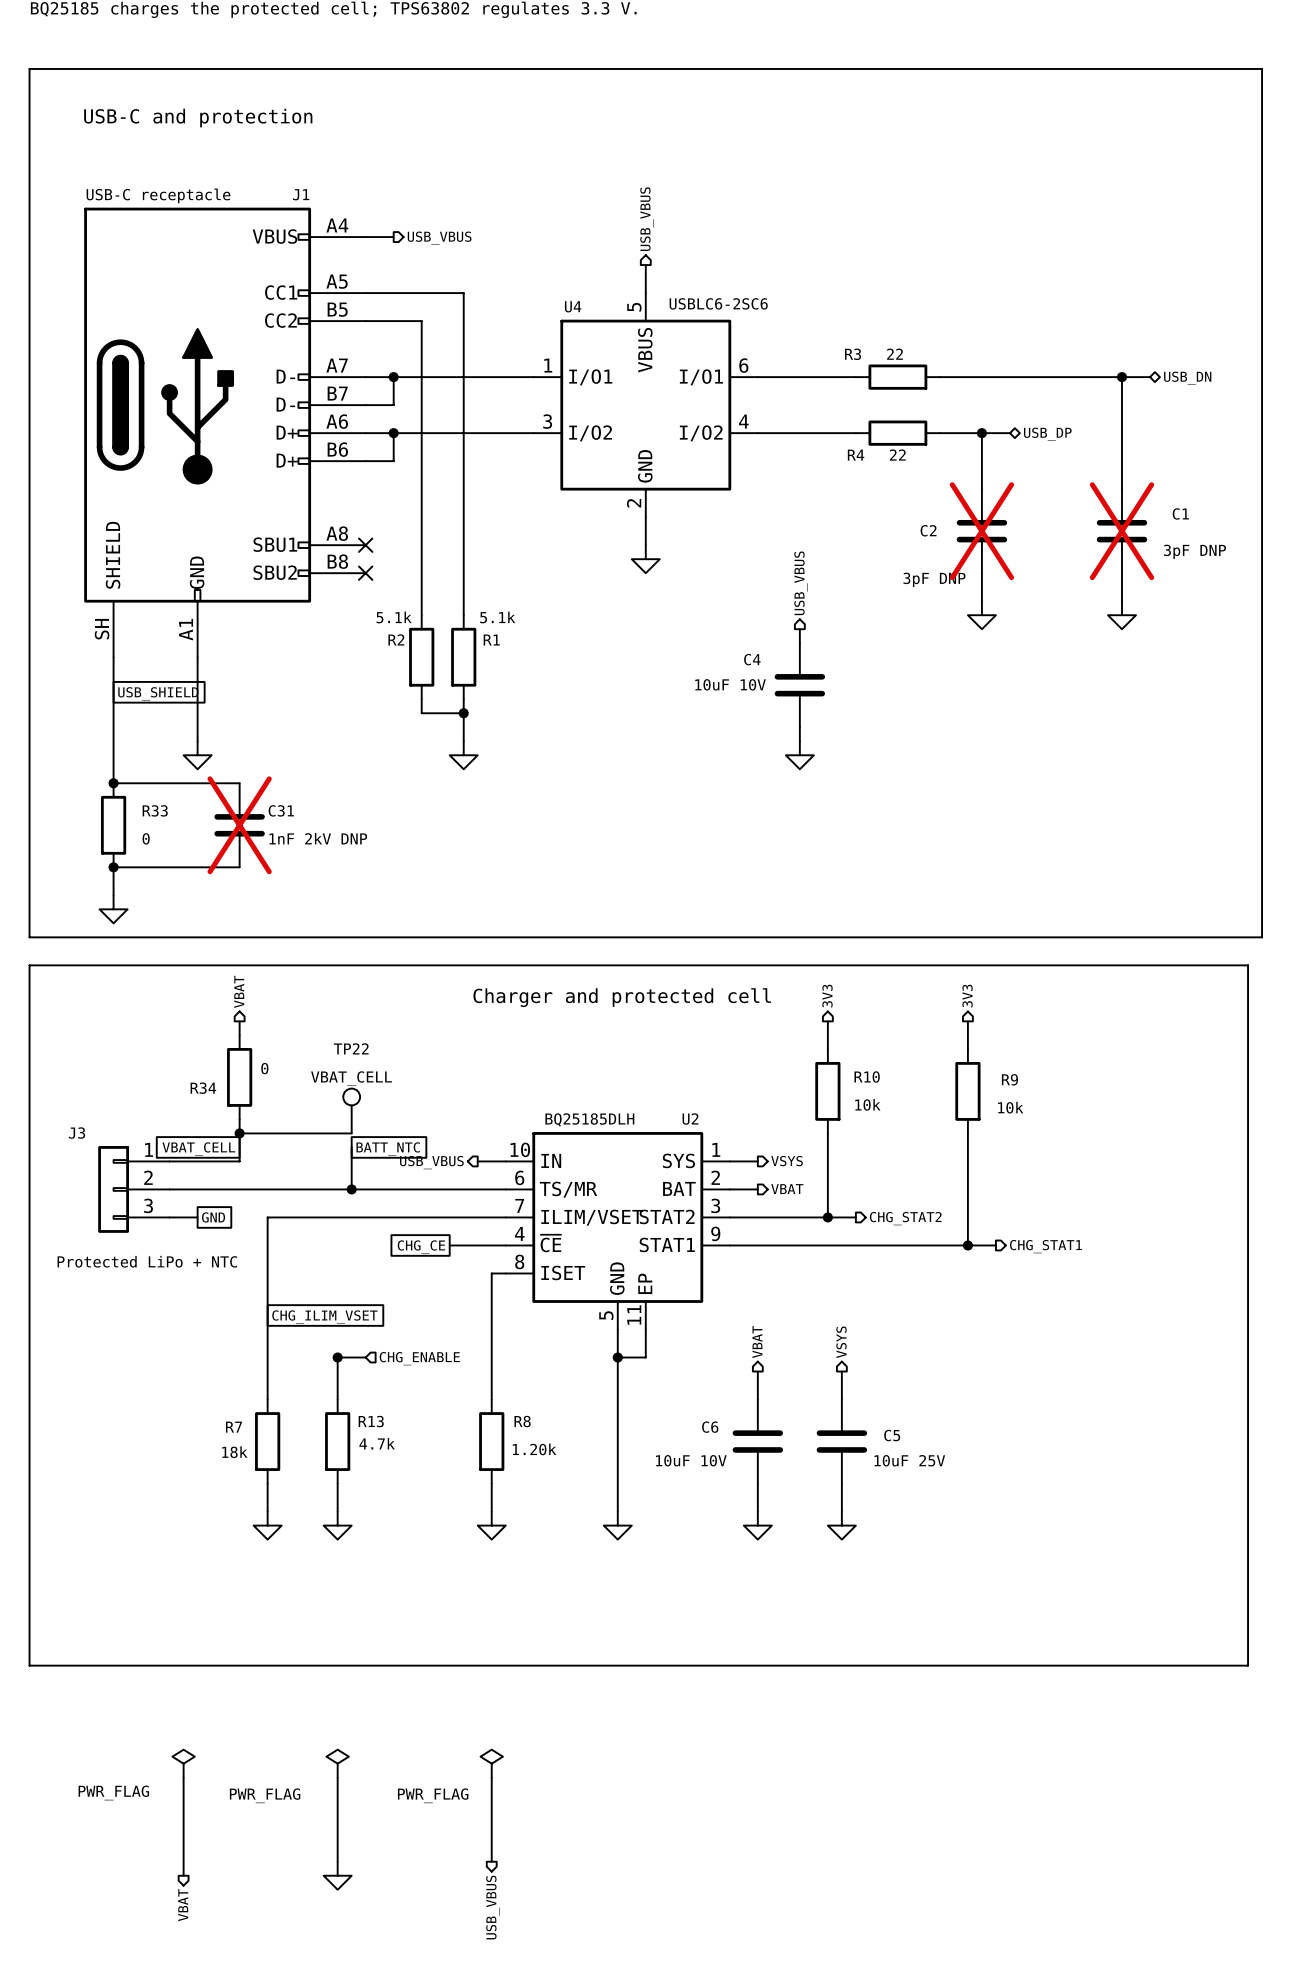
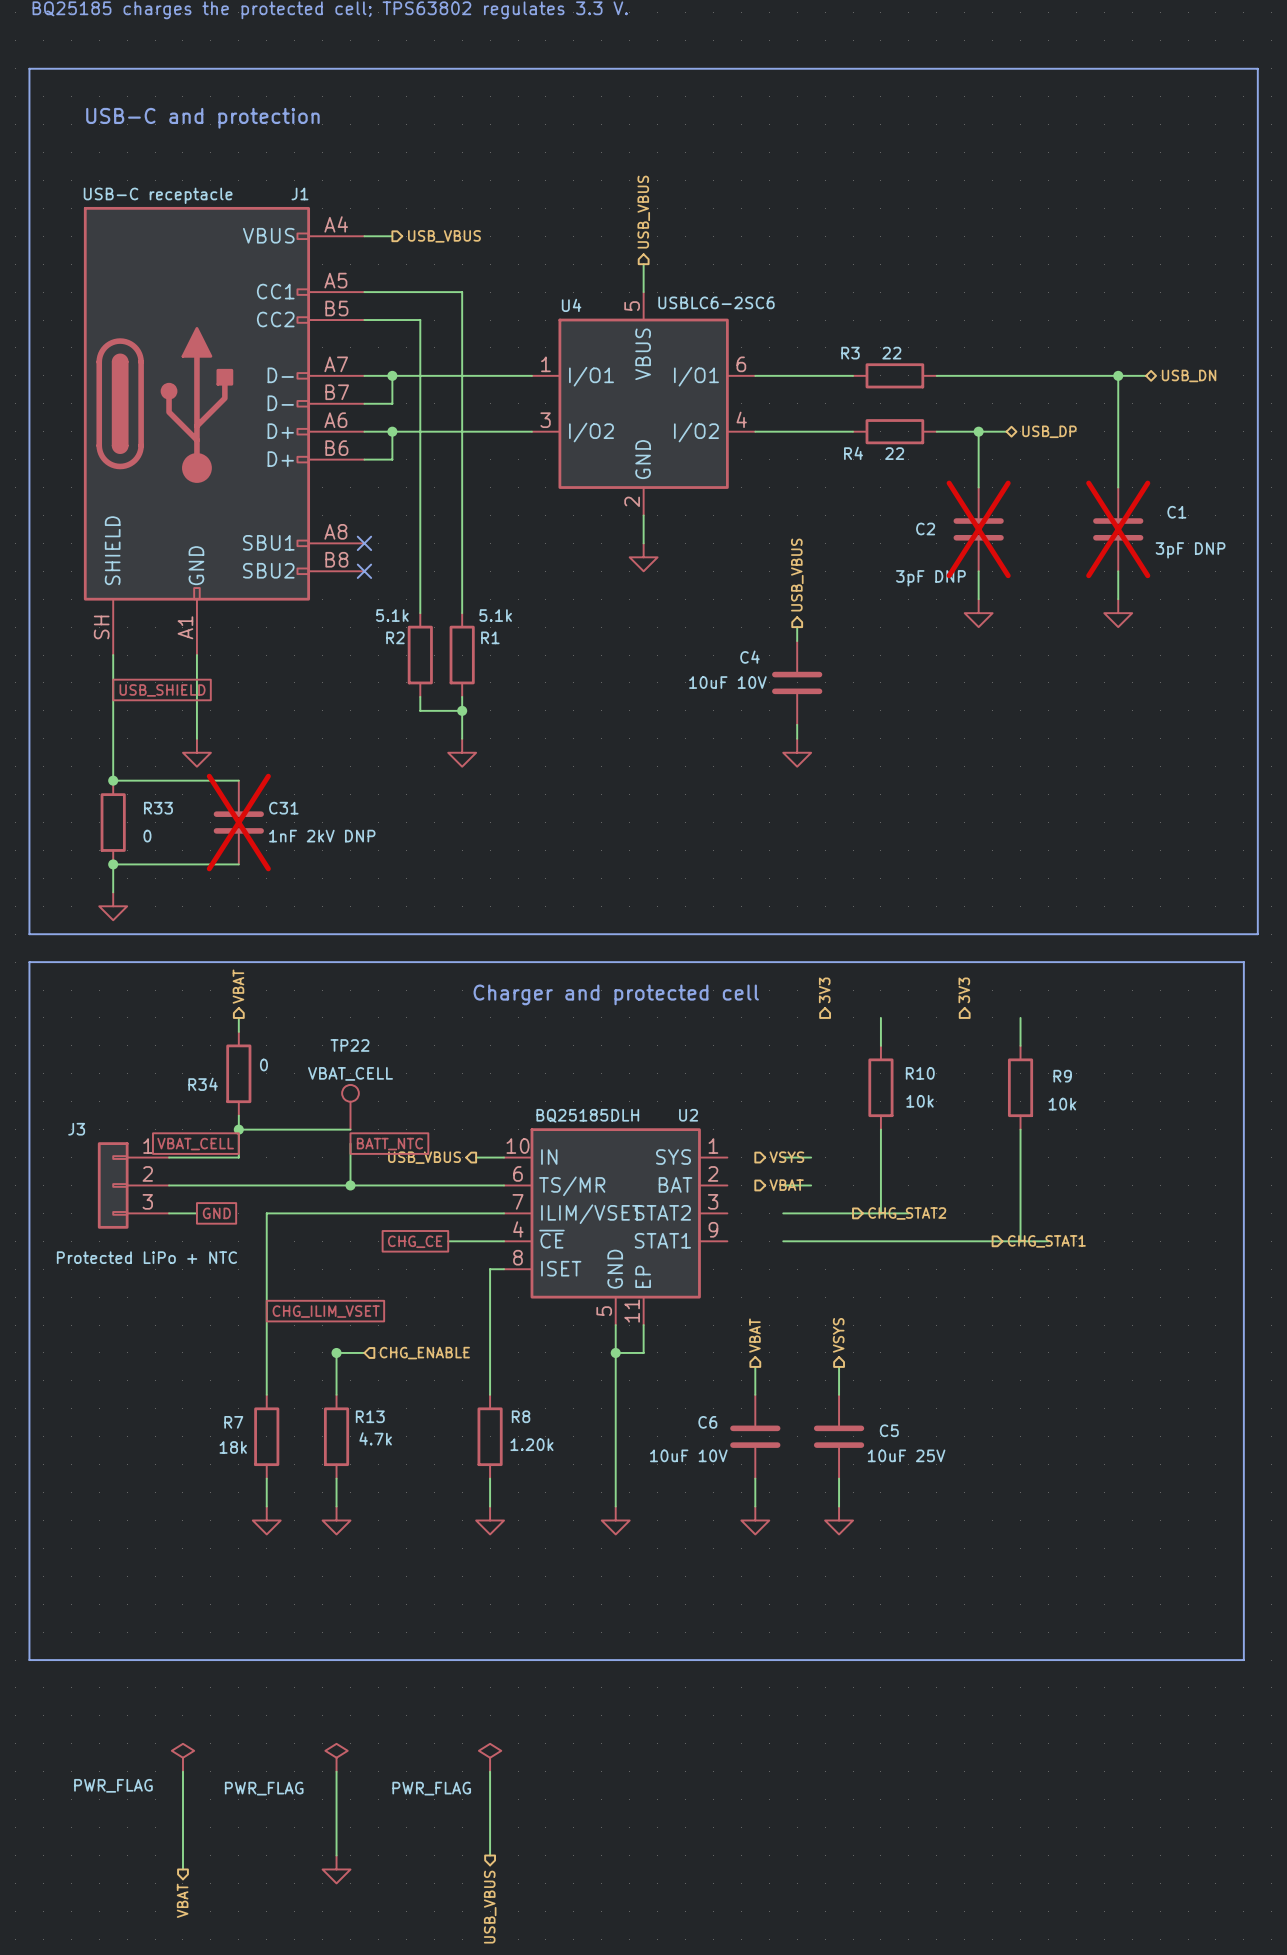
wire: (827, 1021) (827, 1049) -> (880, 1017) (880, 1045)
wire: (967, 1021) (967, 1049) -> (1020, 1017) (1020, 1045)
R10 position: (827, 1091) -> (880, 1087)
R9 position: (967, 1091) -> (1020, 1087)
wire: (827, 1133) (827, 1217) -> (880, 1129) (880, 1213)
wire: (967, 1133) (967, 1245) -> (1020, 1129) (1020, 1241)
wire: (729, 1161) (757, 1161) -> (783, 1157) (811, 1157)
wire: (729, 1189) (757, 1189) -> (783, 1185) (811, 1185)
wire: (729, 1217) (785, 1217) -> (853, 1213) (908, 1213)
junction: (827, 1217) -> none
wire: (729, 1245) (785, 1245) -> (992, 1241) (1048, 1241)
junction: (967, 1245) -> none

